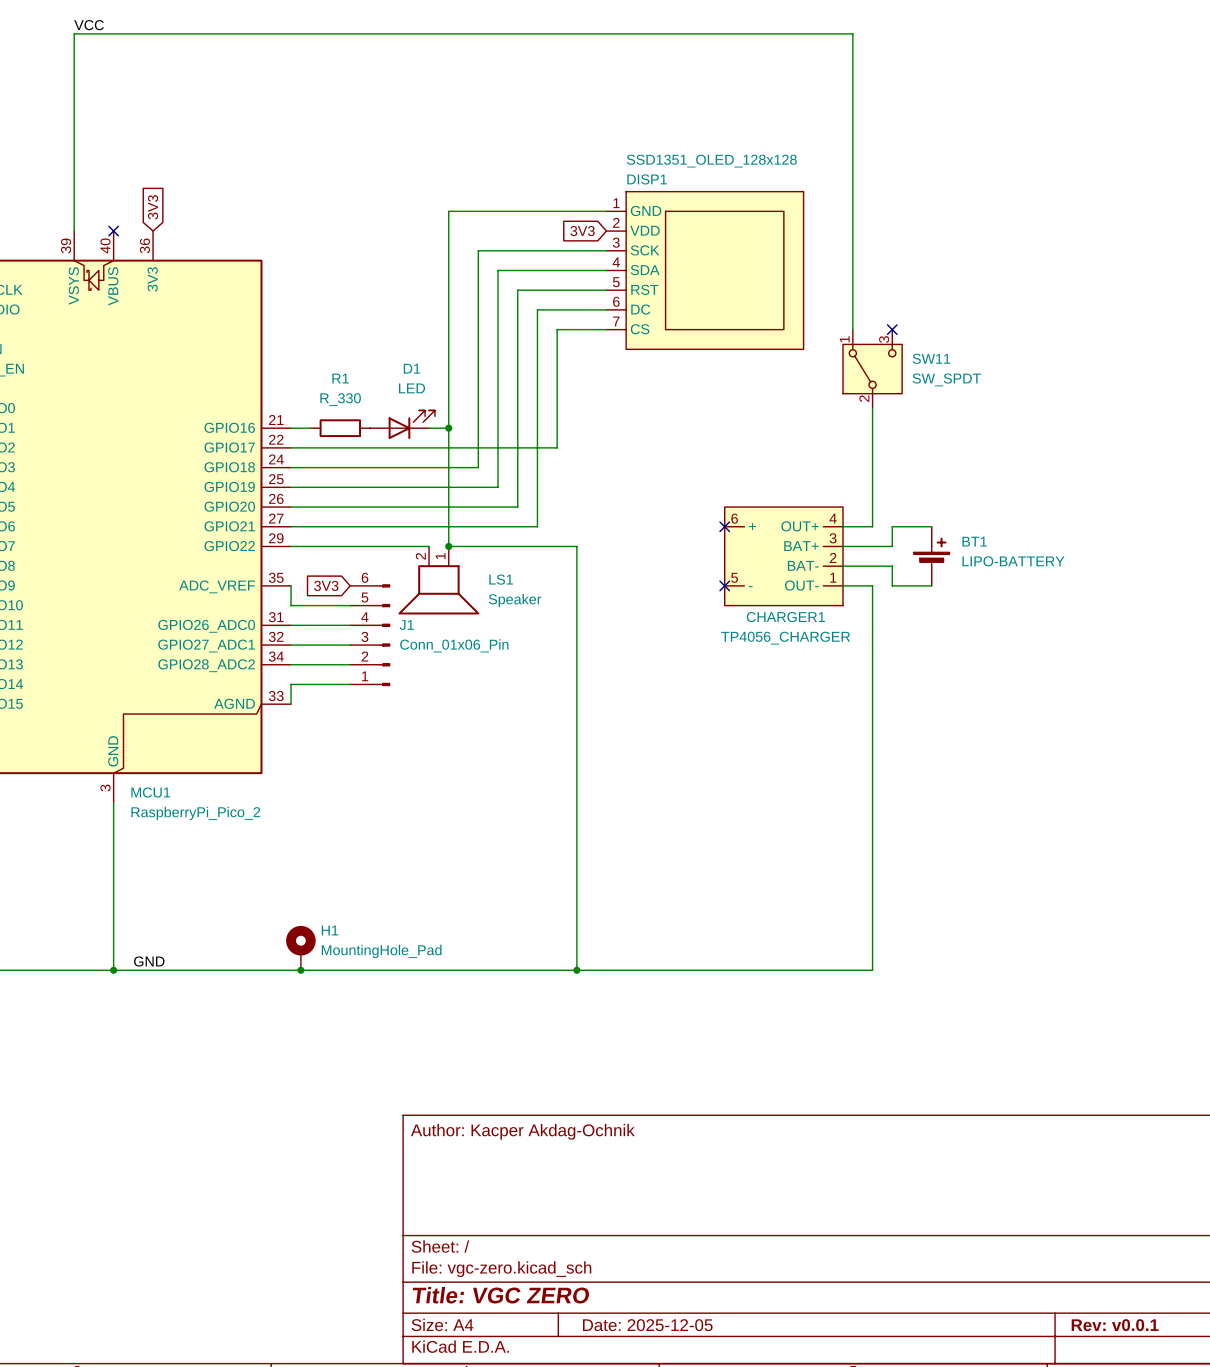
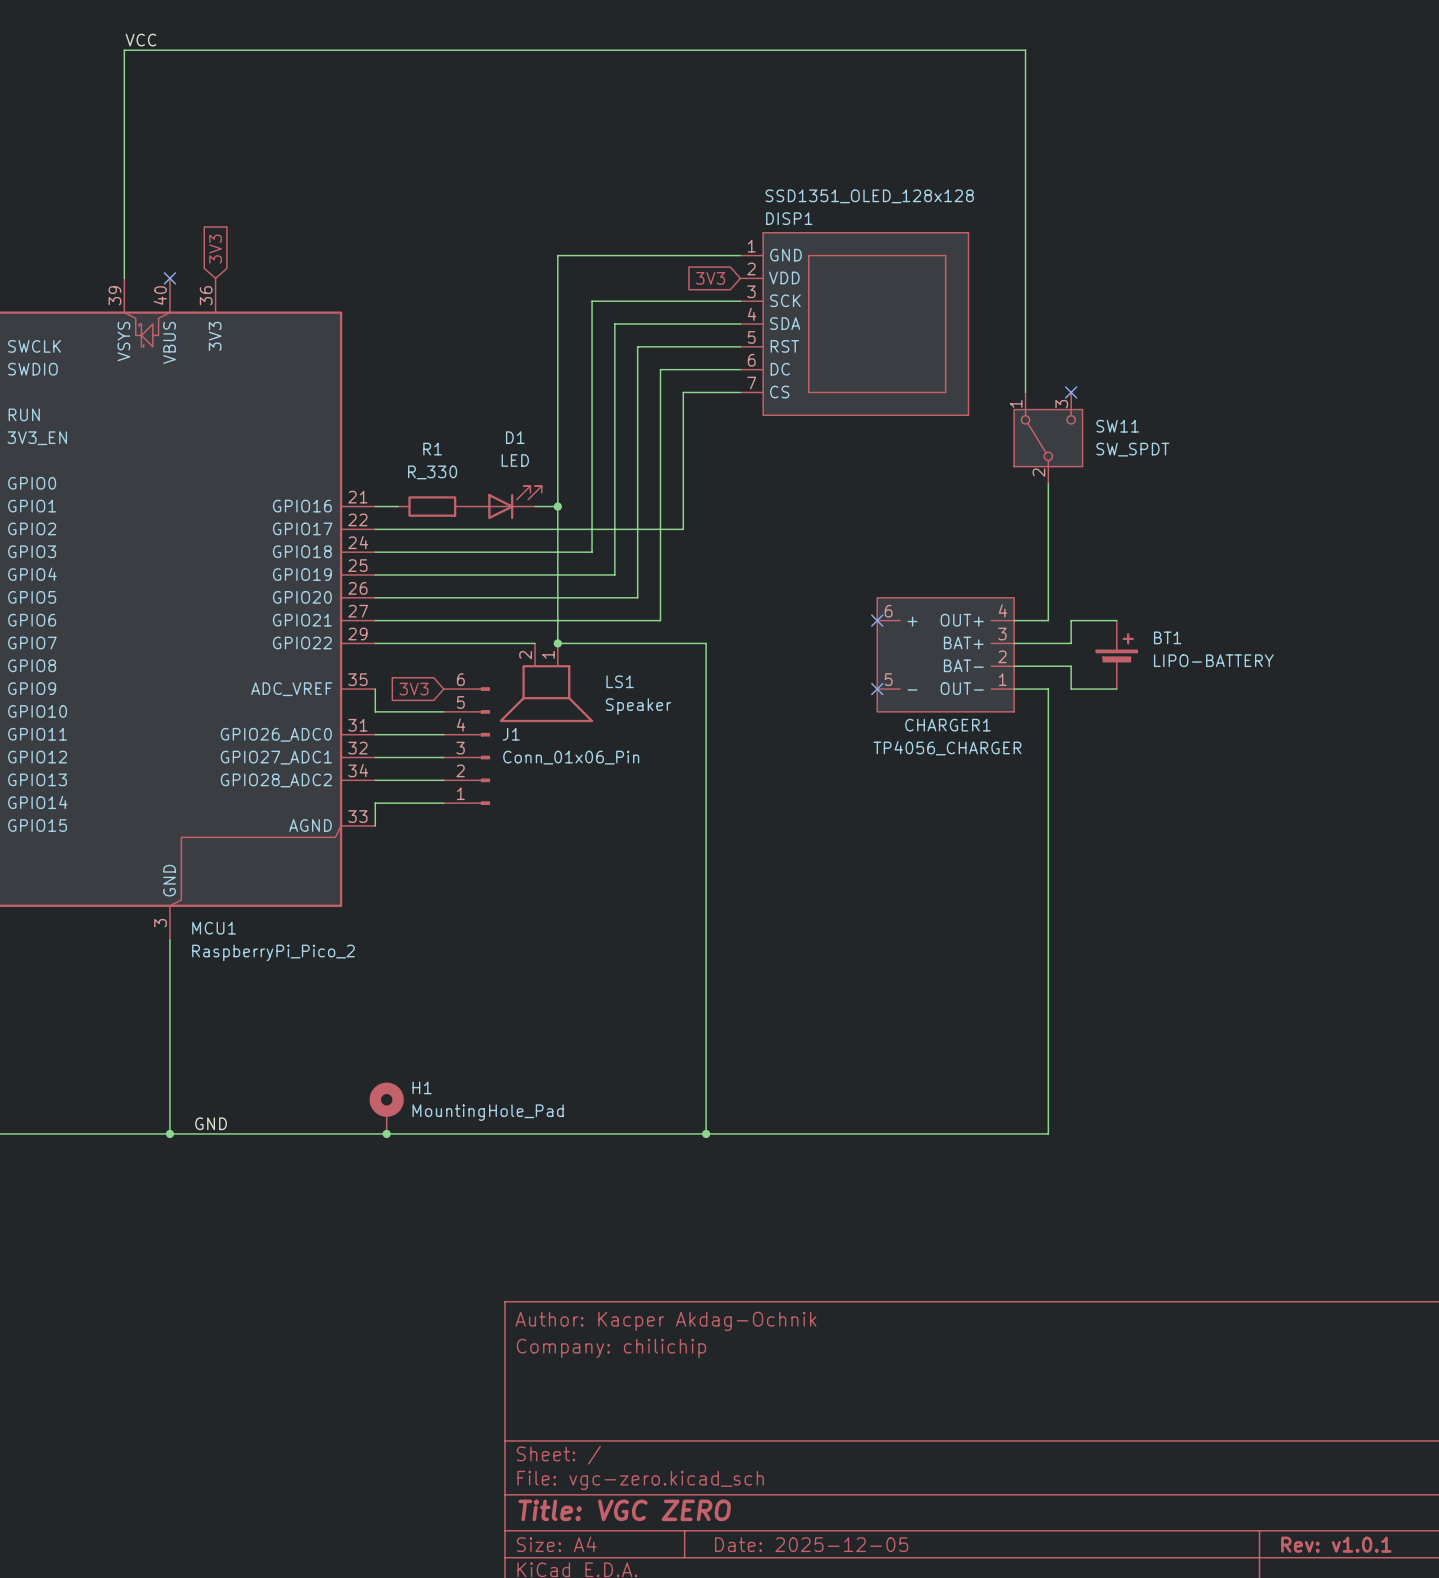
title block: none -> Company: chilichip (611, 1348)
title block: Rev: v0.0.1 (1115, 1325) -> Rev: v1.0.1 (1336, 1544)

